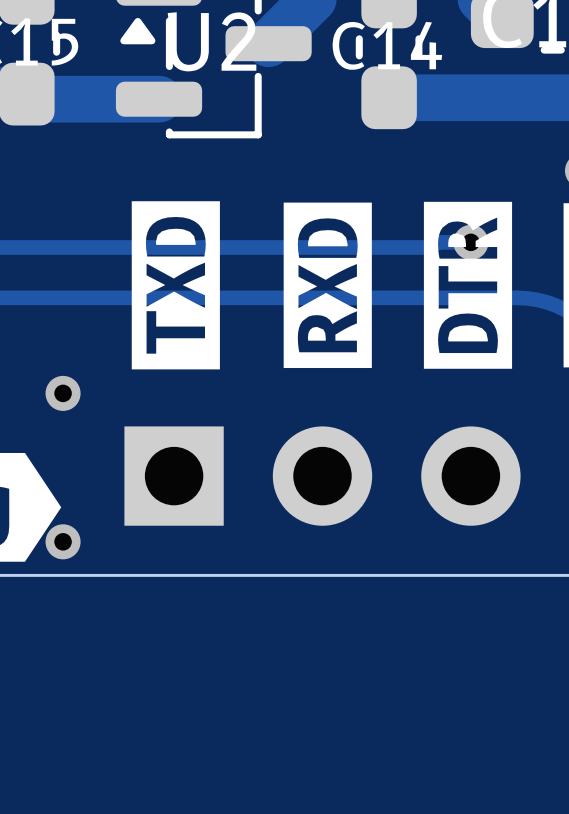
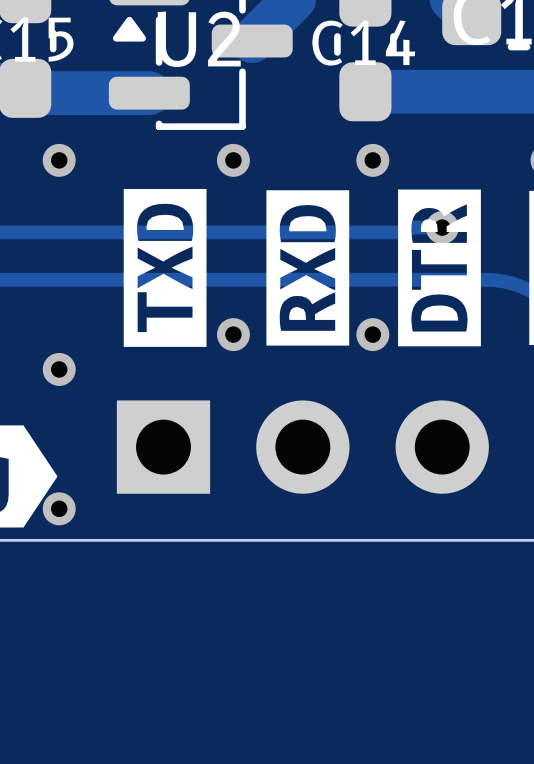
via: none -> (59, 160)
via: none -> (233, 160)
via: none -> (372, 160)
via: none -> (233, 334)
via: none -> (372, 334)

